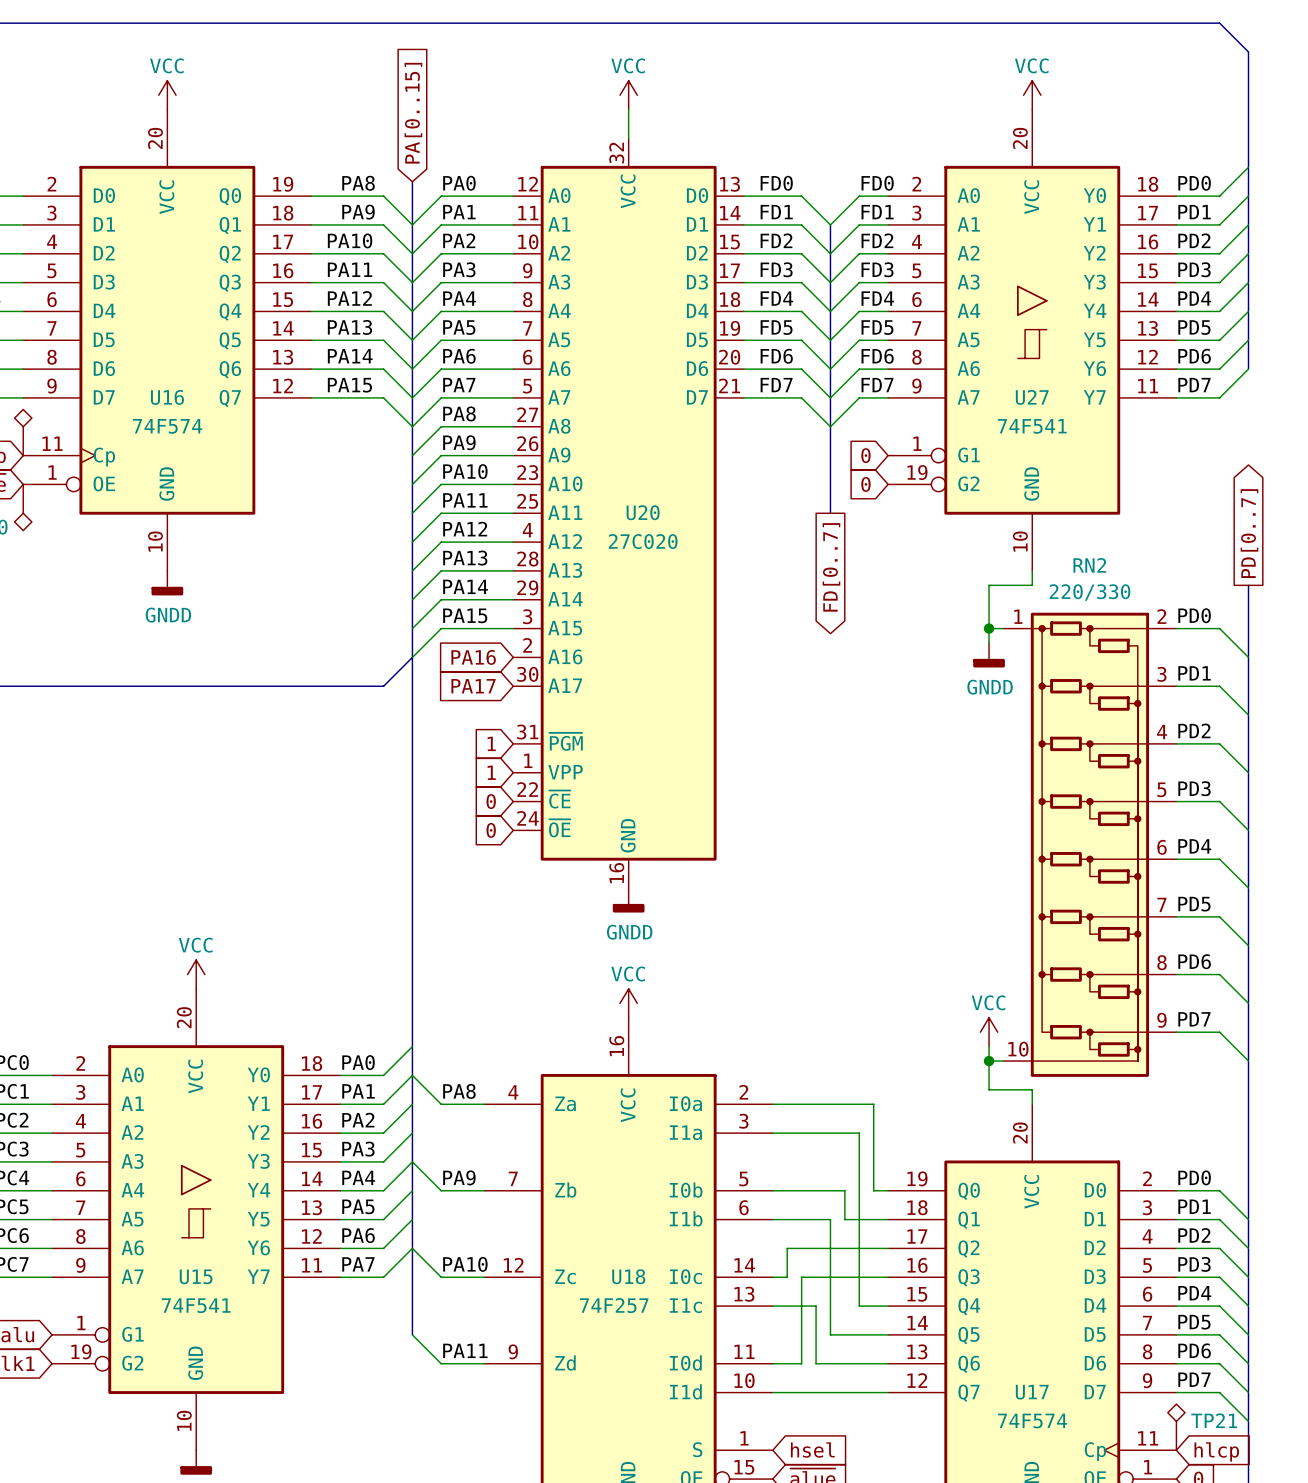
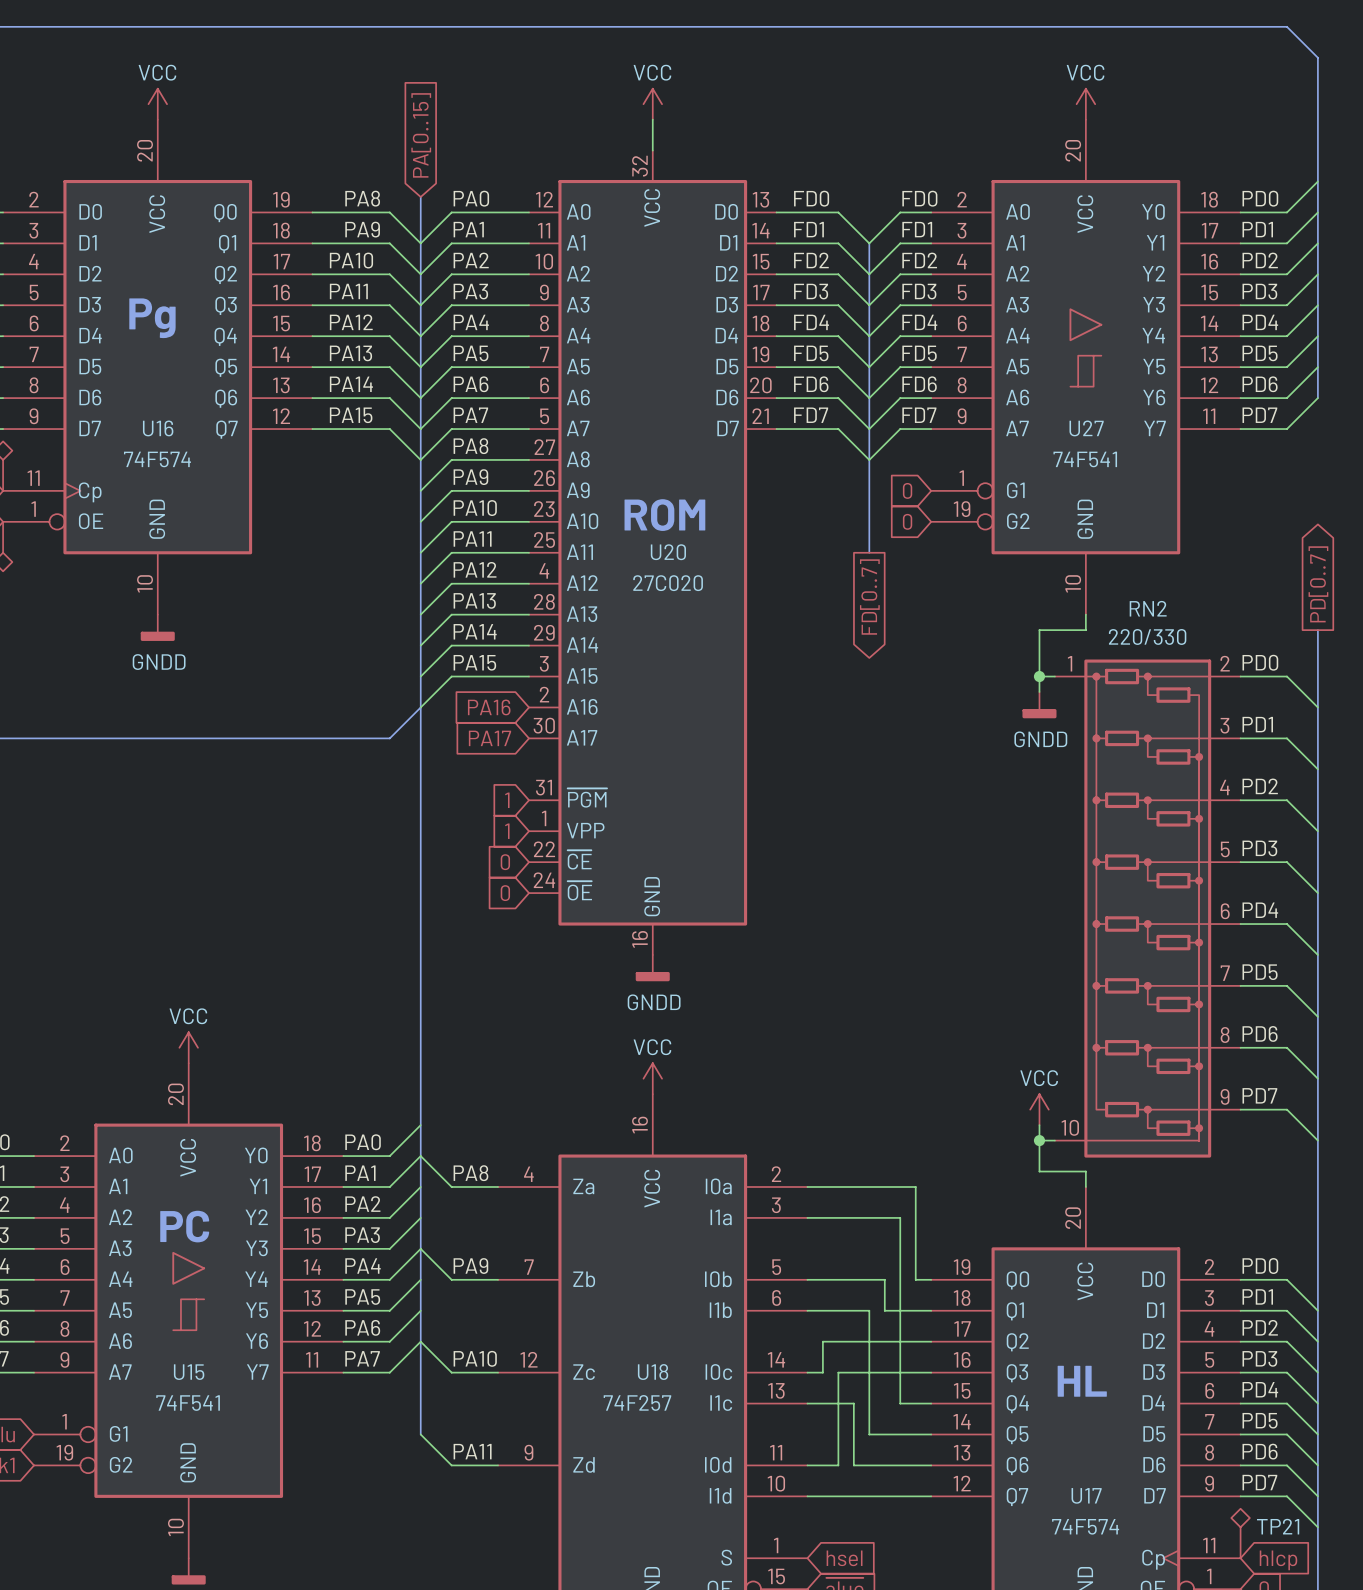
text: none -> Pg (152, 318)
text: none -> ROM (664, 515)
text: none -> PC (184, 1226)
text: none -> HL (1082, 1381)

